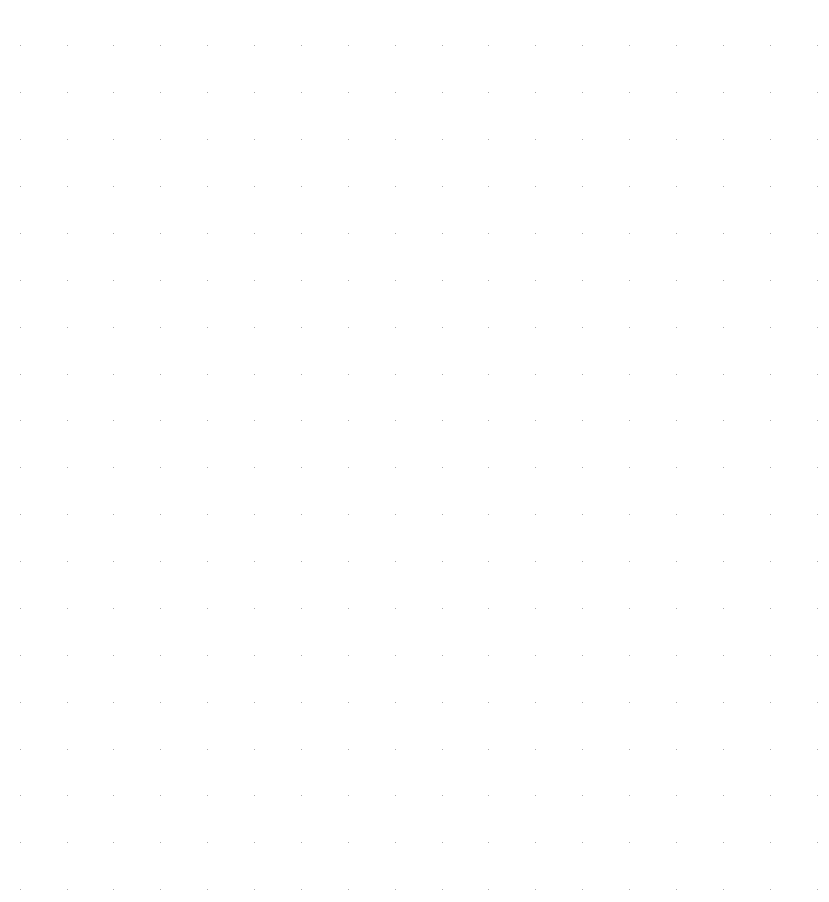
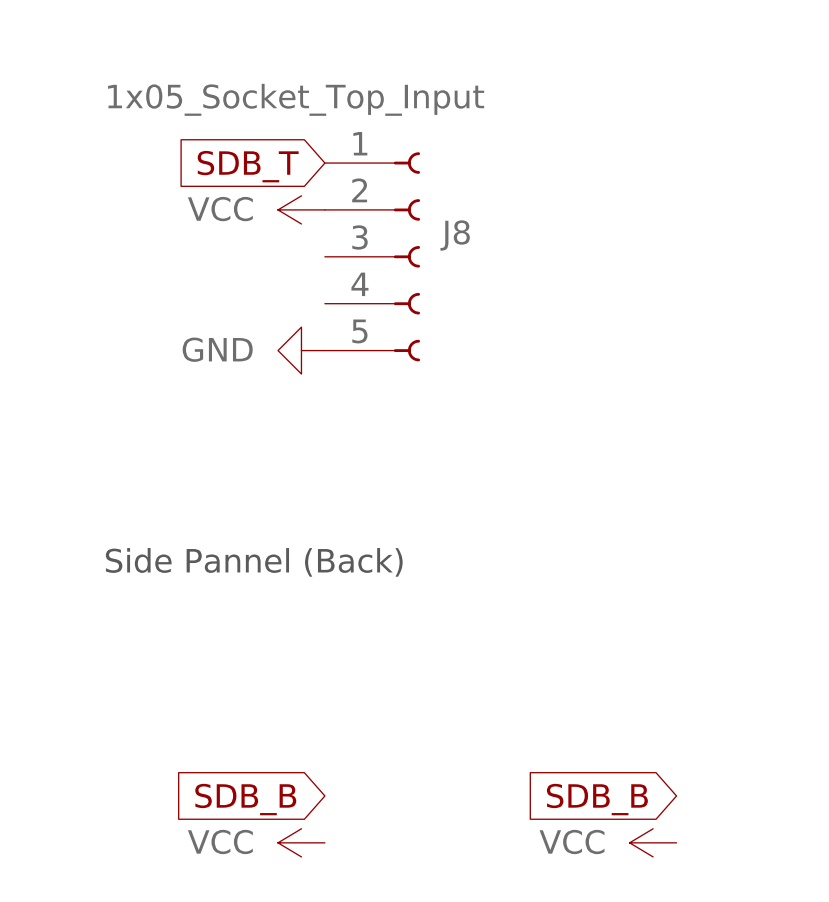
global label: none -> SDB_T (248, 166)
power symbol: none -> VCC (301, 209)
J8: none -> 1x05_Socket_Top_Input (372, 256)
power symbol: none -> GND (301, 350)
text: none -> Side Pannel (Back) (254, 562)
global label: none -> SDB_B (245, 799)
global label: none -> SDB_B (597, 799)
power symbol: none -> VCC (301, 842)
power symbol: none -> VCC (653, 842)

